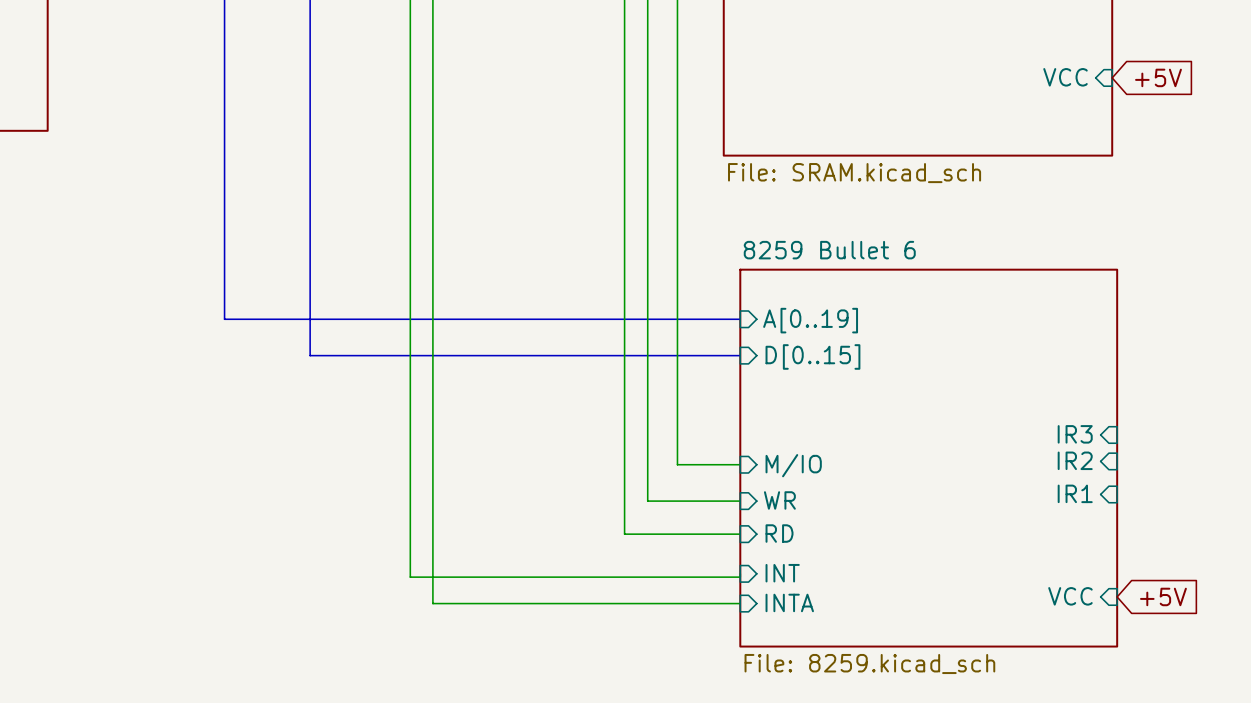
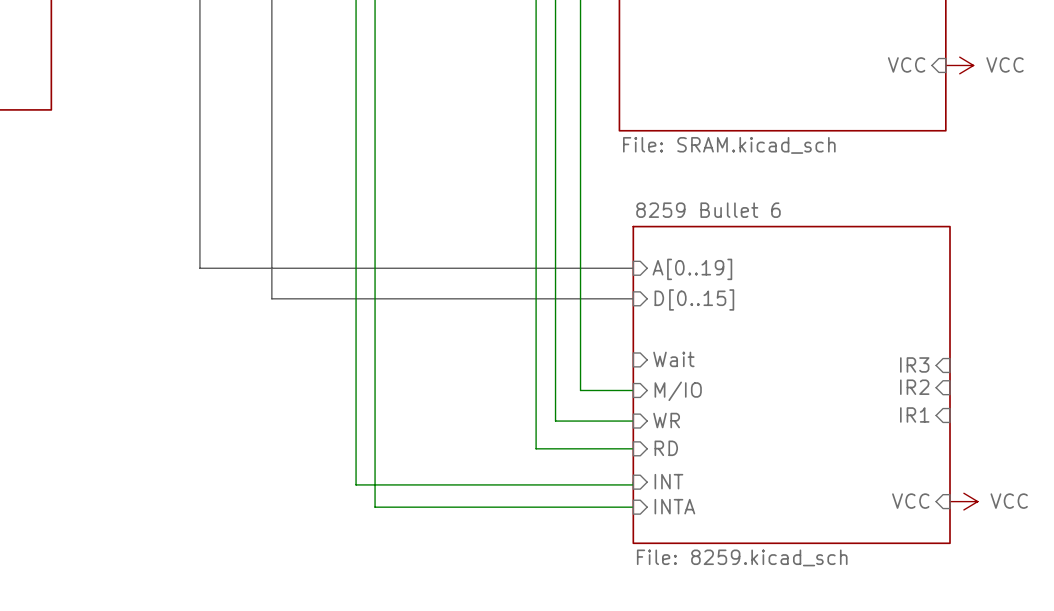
power symbol: none -> VCC (959, 65)
global label: +5V (1158, 77) -> none
sheet pin: none -> Wait (673, 359)
power symbol: none -> VCC (963, 501)
global label: +5V (1163, 596) -> none

